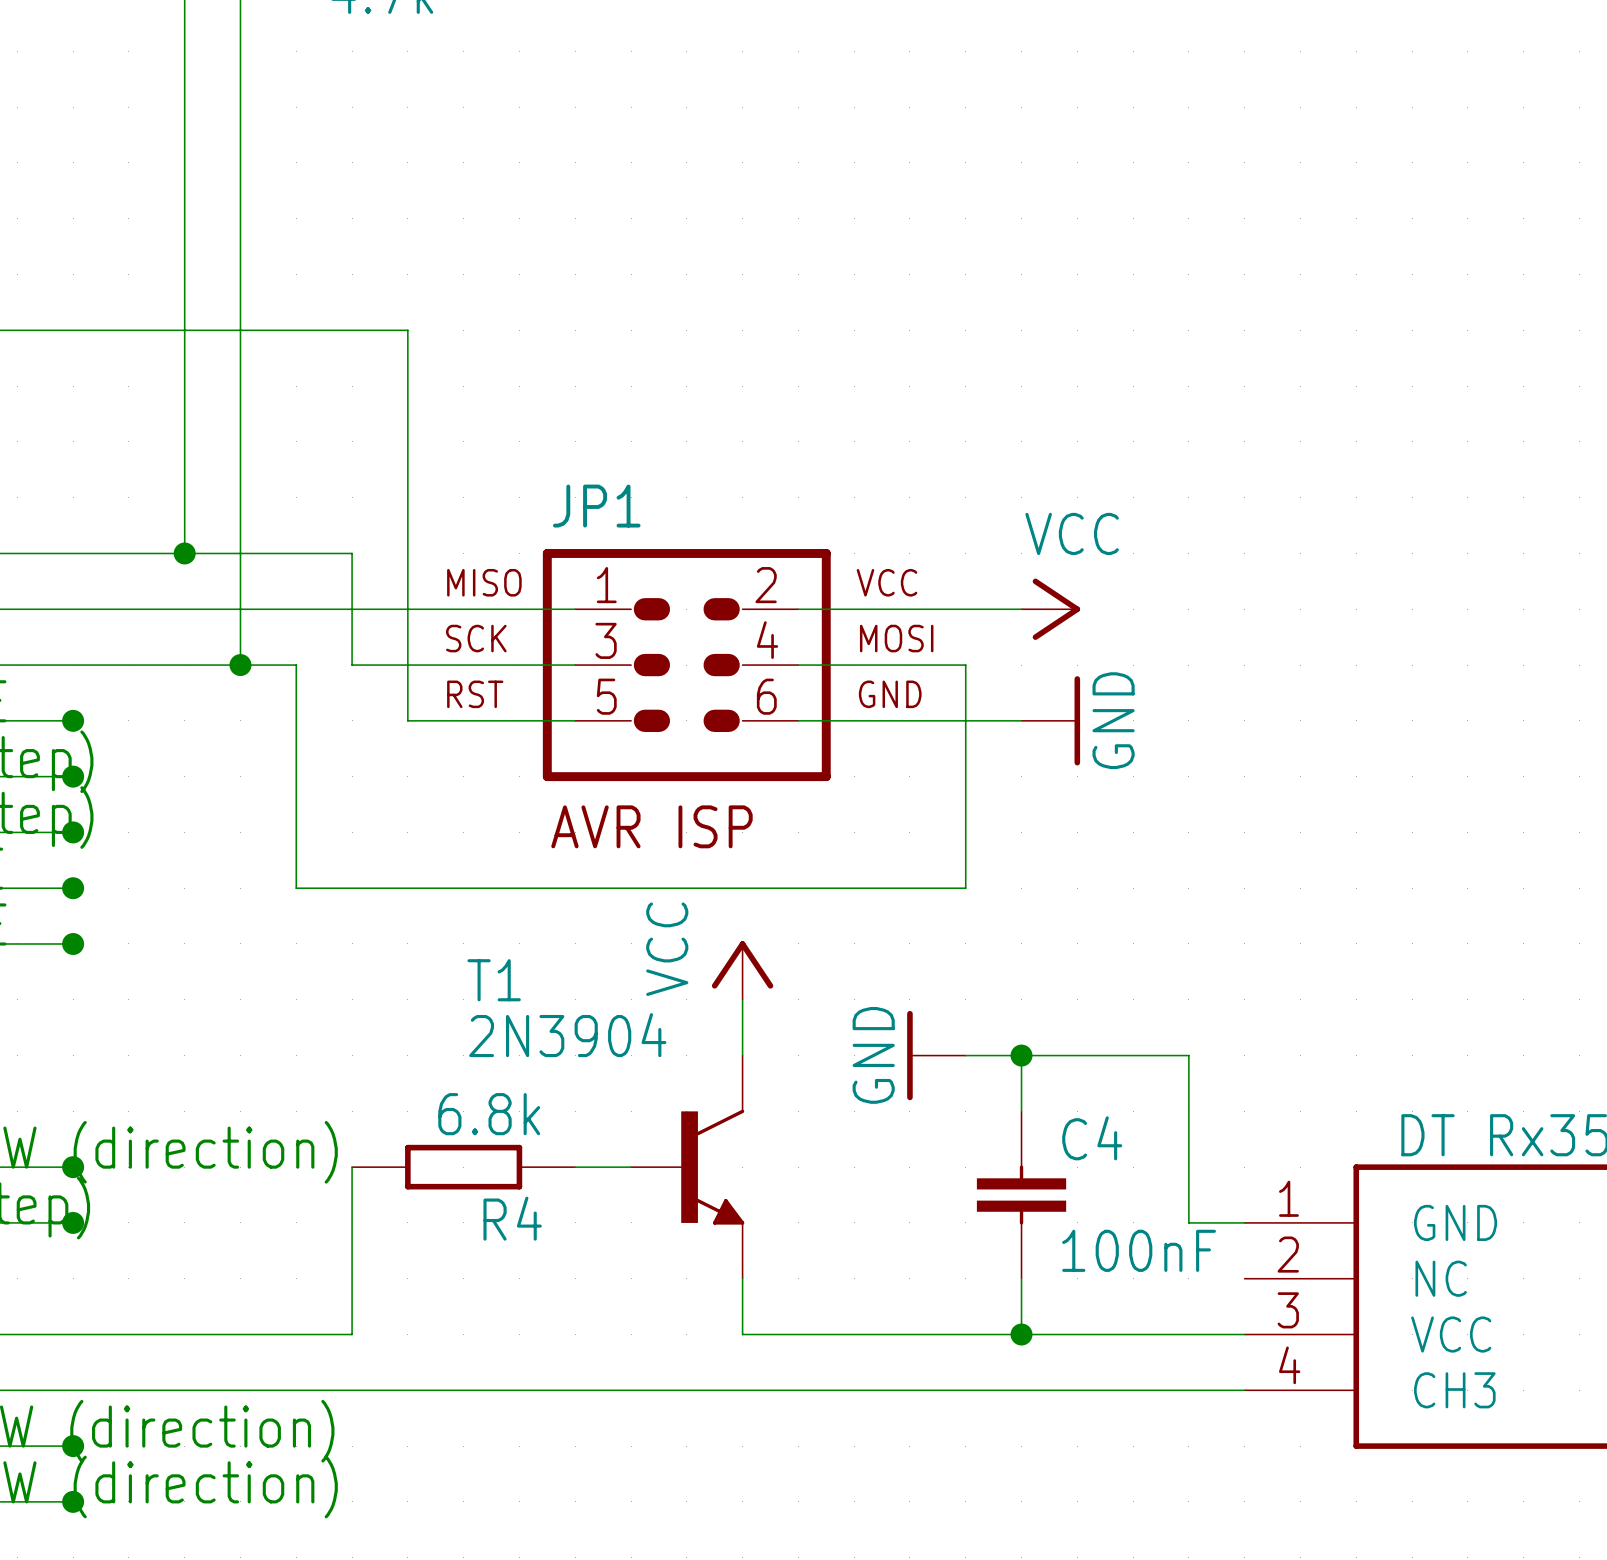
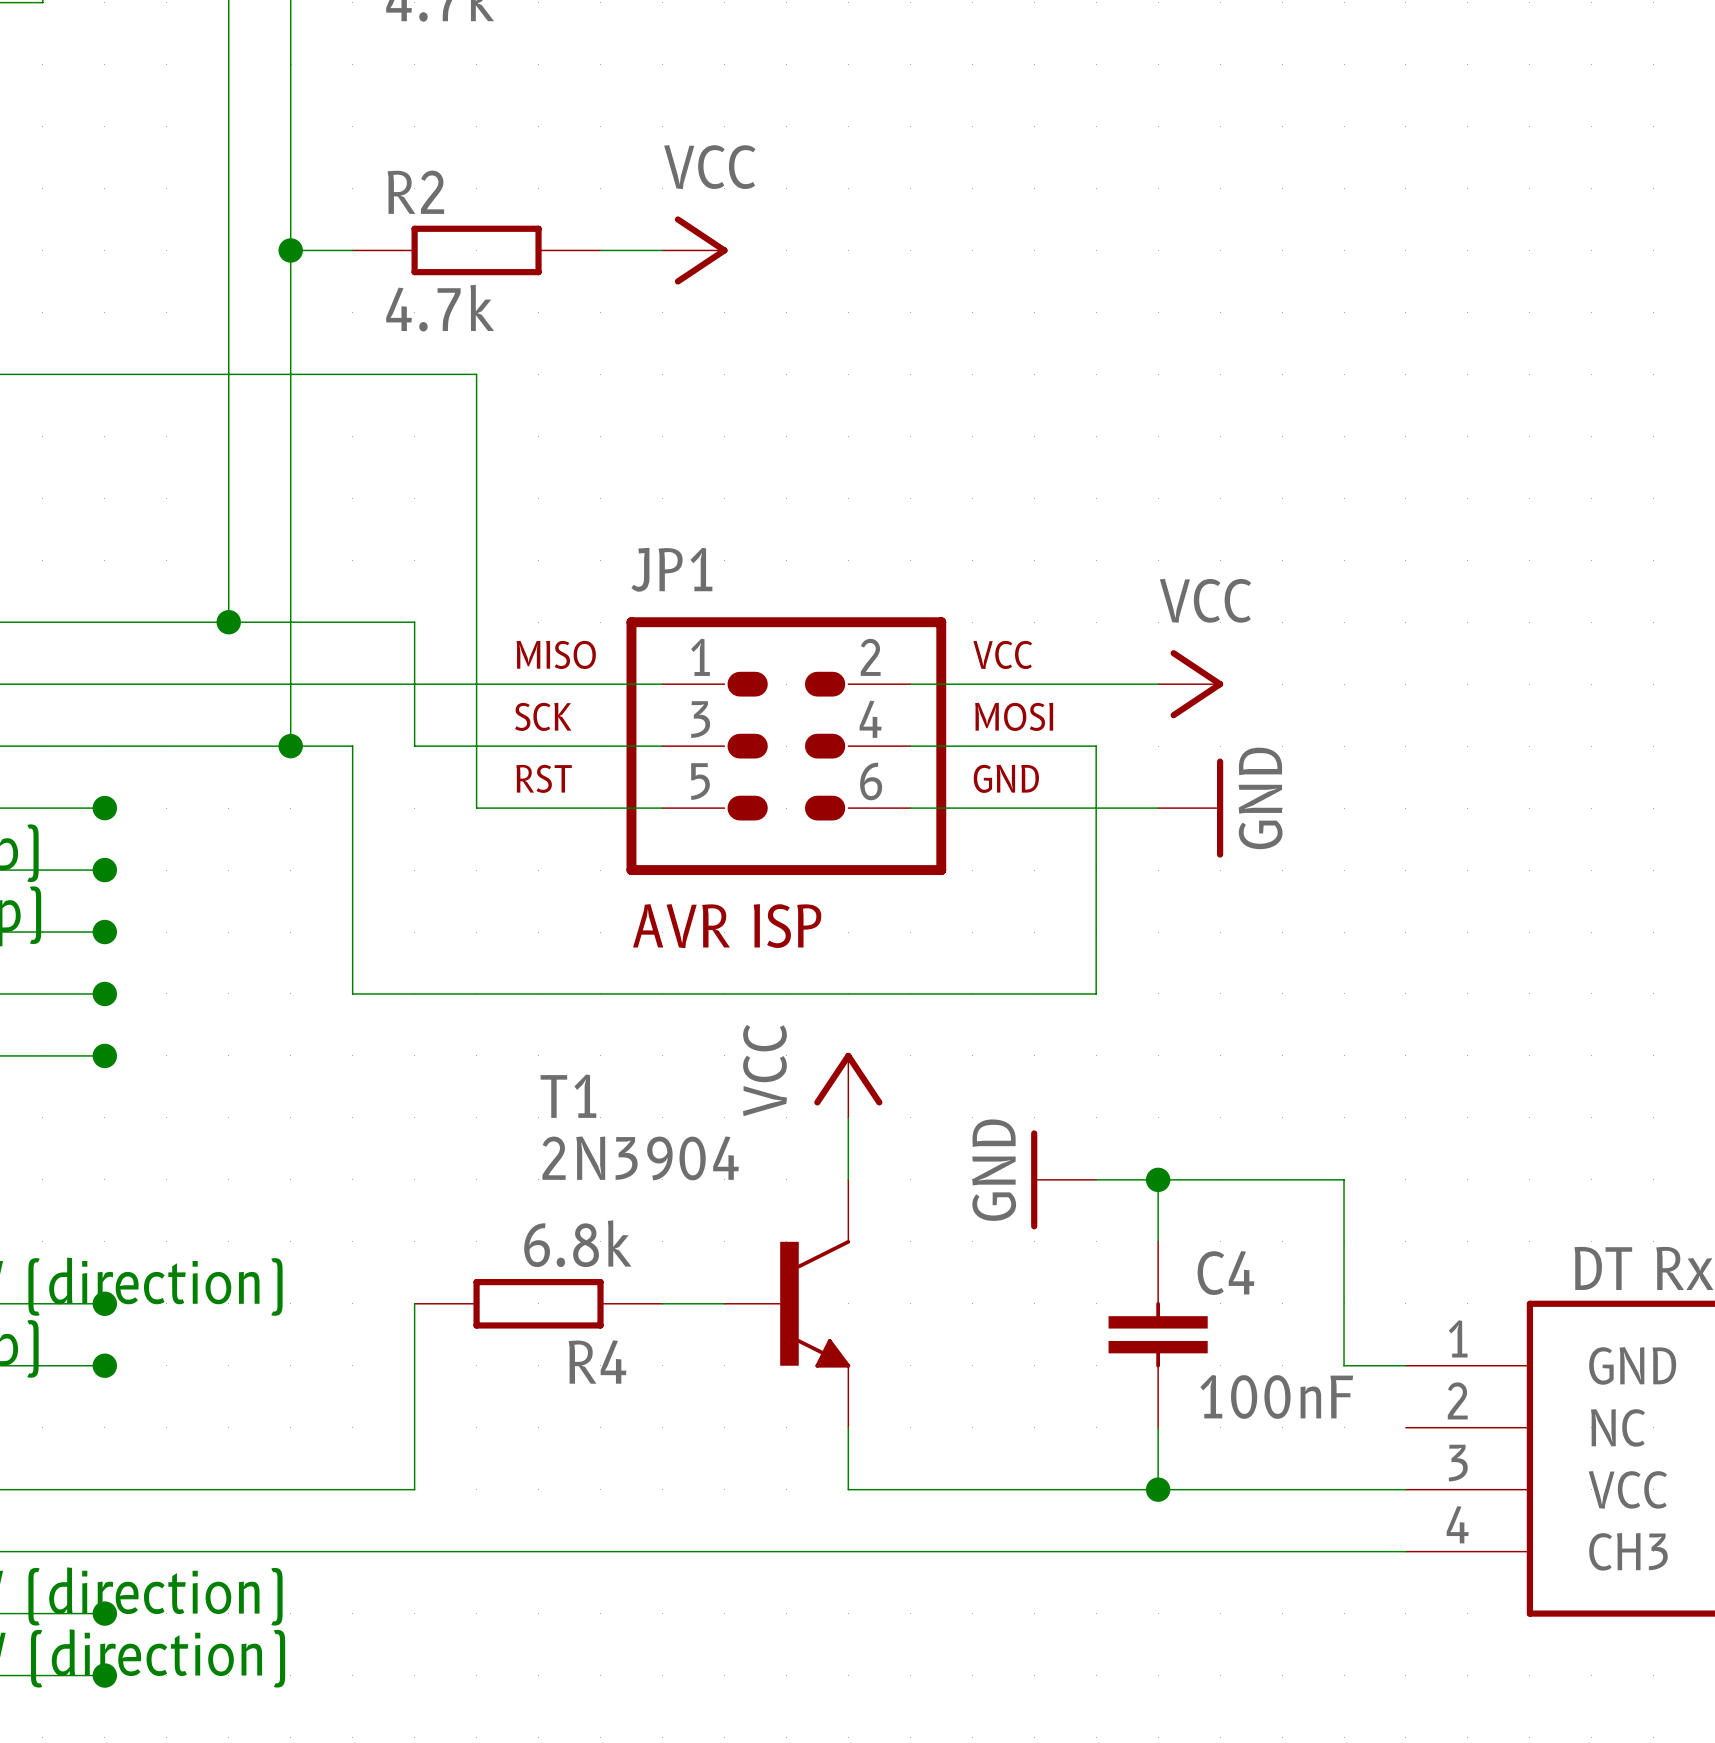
wire: none -> (290, 250) (352, 250)
junction: none -> (290, 250)
R2: none -> 4.7k (476, 250)
wire: none -> (600, 250) (662, 250)
power symbol: none -> VCC (694, 250)

